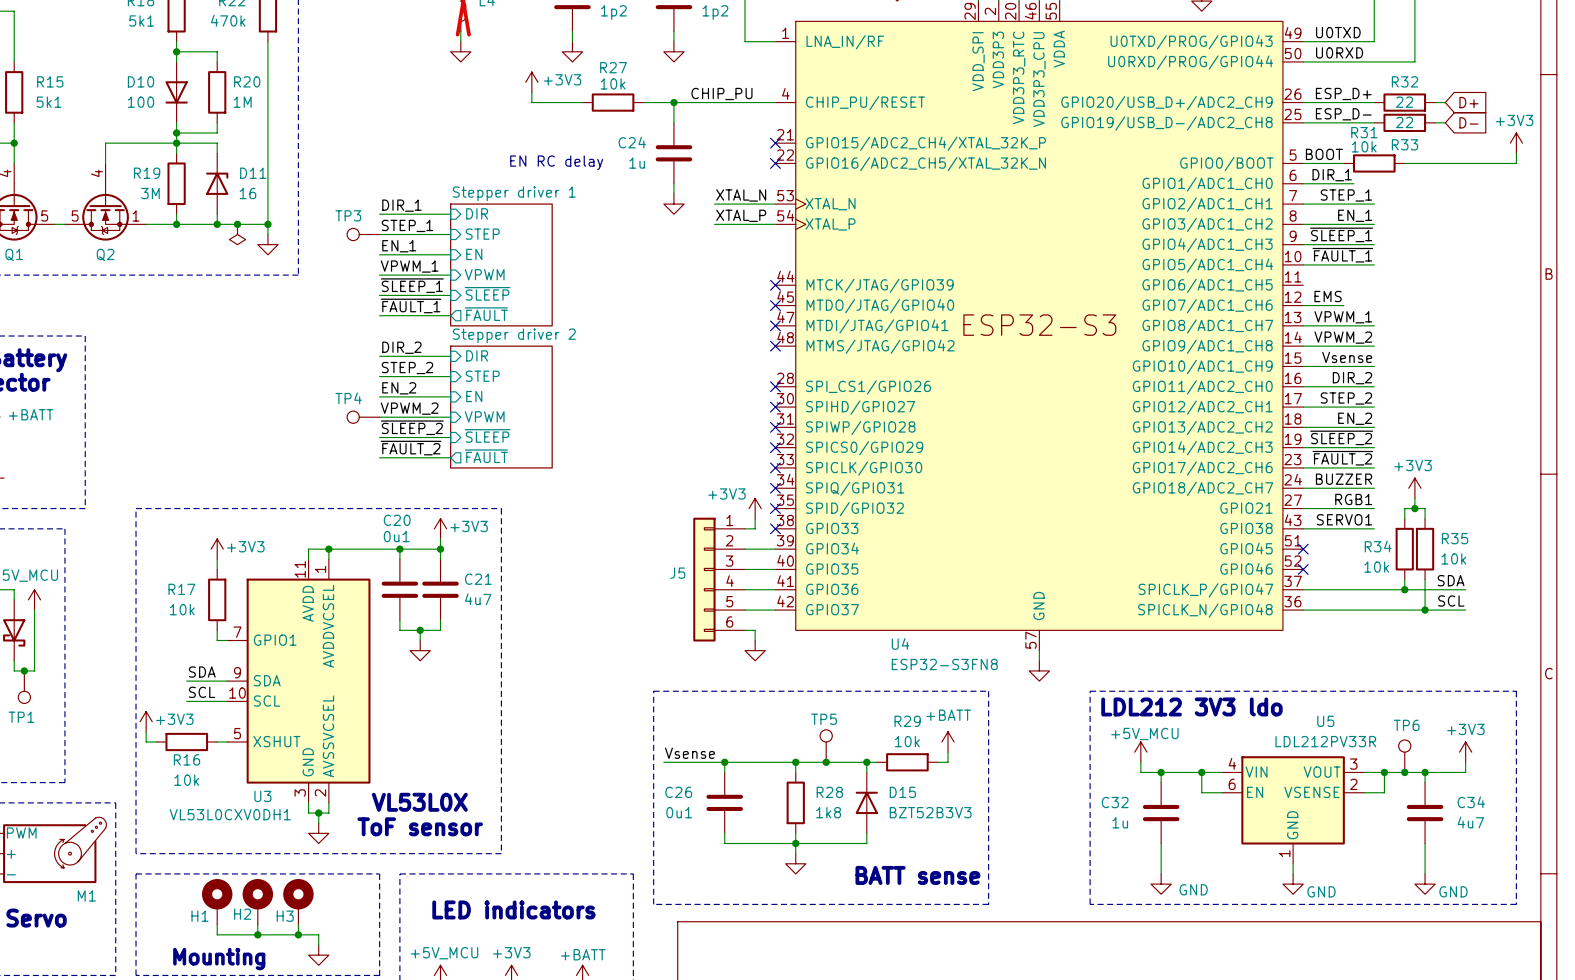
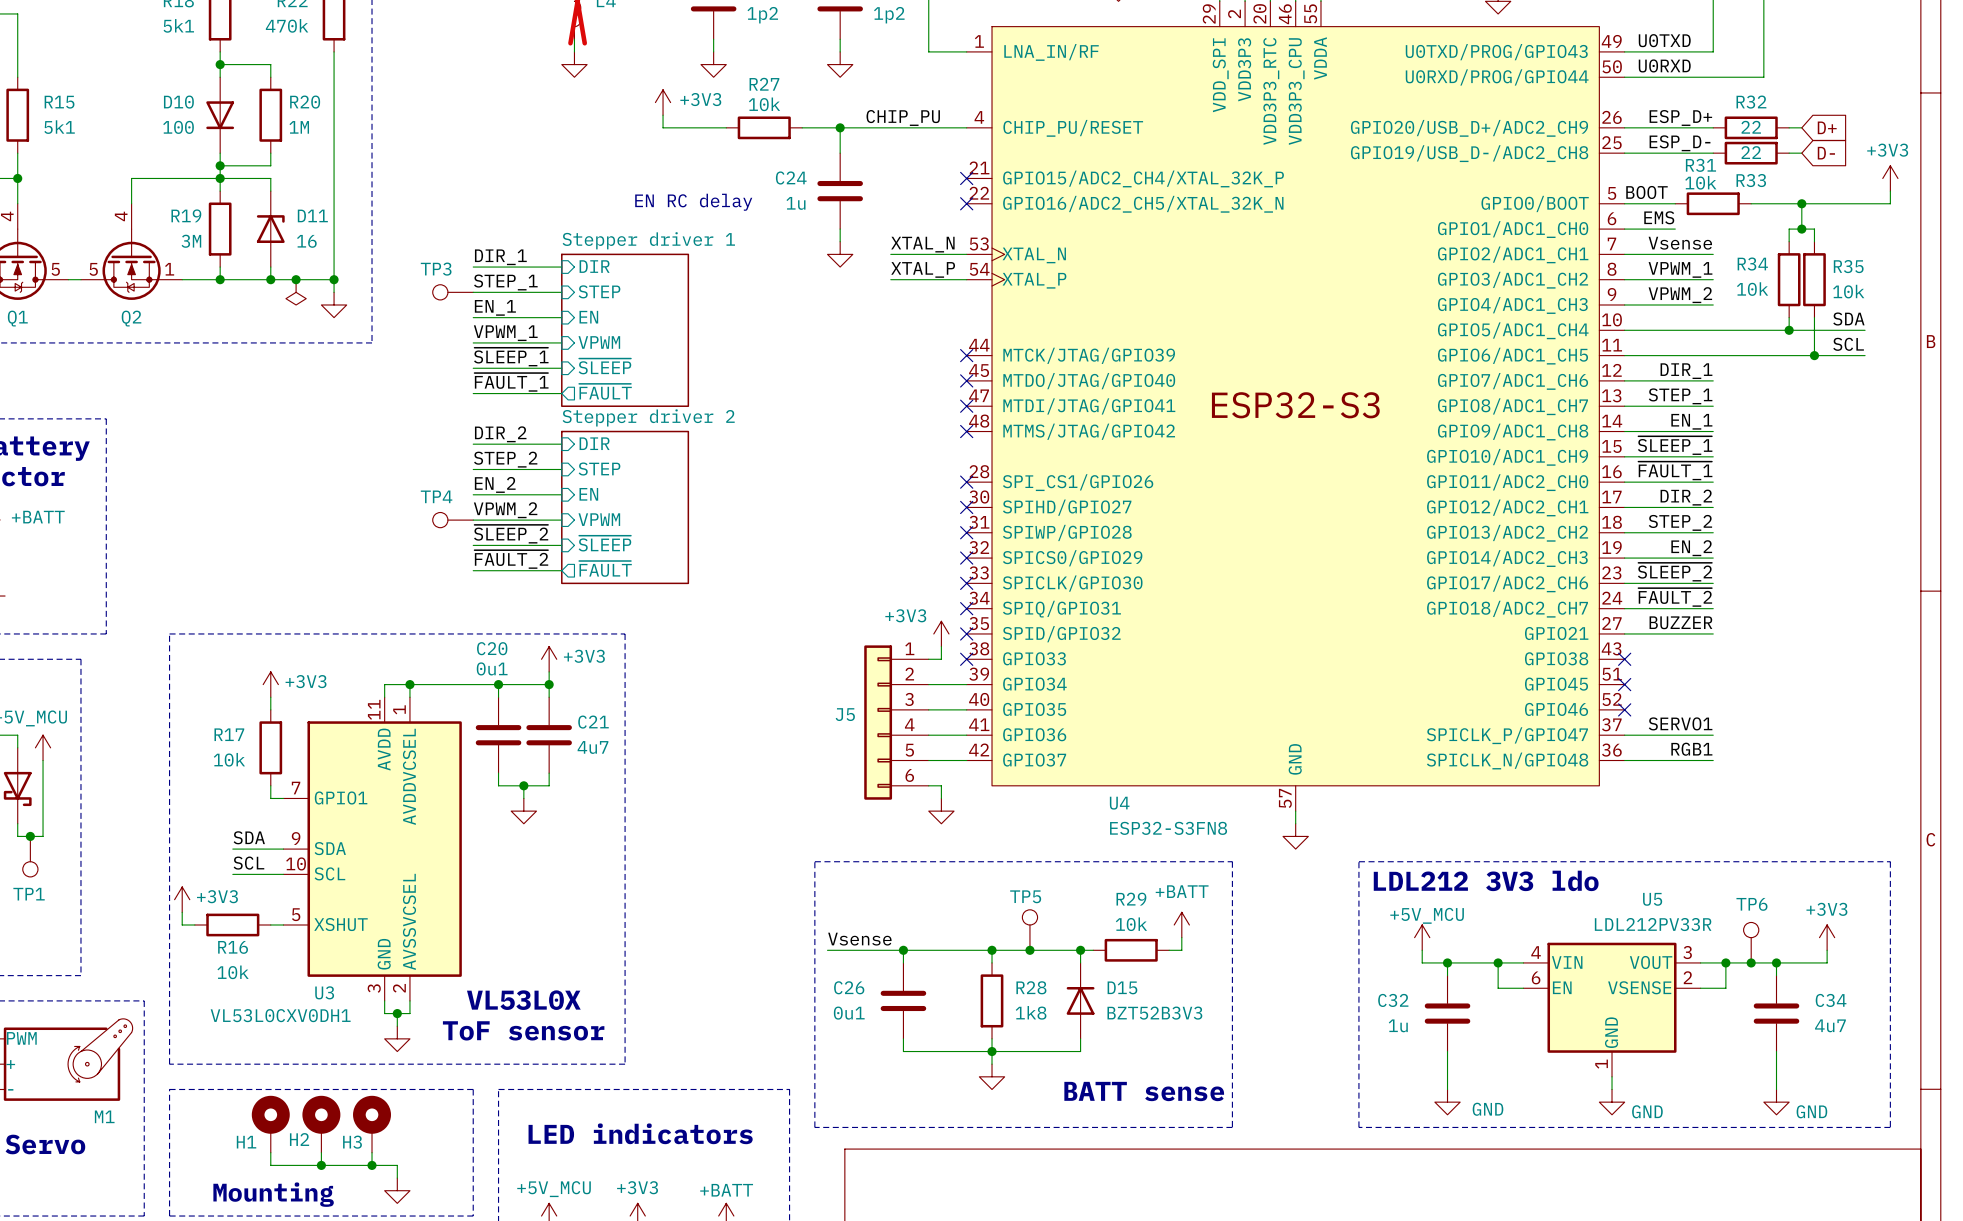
wire: none -> (1801, 203) (1801, 229)
junction: none -> (1801, 203)
label position: DIR_1 (1332, 175) -> DIR_1 (1686, 371)
wire: (1343, 183) (1354, 183) -> none
junction: none -> (1801, 229)
wire: none -> (1789, 241) (1789, 229) (1814, 229) (1814, 241)
label: STEP_1 (1346, 195) -> Vsense (1680, 243)
label: EN_1 (1355, 215) -> VPWM_1 (1680, 269)
label: ~{SLEEP_1} (1341, 234) -> VPWM_2 (1680, 295)
wire: none -> (1789, 317) (1789, 330)
wire: none -> (1814, 317) (1814, 355)
label: ~{FAULT_1} (1342, 255) -> none
label: none -> SDA (1848, 319)
wire: none -> (1713, 330) (1865, 330)
junction: none -> (1789, 330)
label: none -> SCL (1848, 344)
wire: none -> (1624, 355) (1865, 355)
junction: none -> (1814, 355)
label position: EMS (1328, 296) -> EMS (1659, 217)
wire: none -> (1675, 380) (1713, 380)
label: VPWM_1 (1343, 317) -> STEP_1 (1680, 396)
label: VPWM_2 (1343, 337) -> EN_1 (1691, 421)
label: Vsense (1347, 357) -> ~{SLEEP_1} (1675, 445)
label: DIR_2 (1352, 378) -> ~{FAULT_1} (1675, 470)
label: STEP_2 (1346, 398) -> DIR_2 (1686, 497)
label: EN_2 (1355, 418) -> STEP_2 (1680, 522)
label: ~{SLEEP_2} (1341, 437) -> EN_2 (1691, 548)
label: ~{FAULT_2} (1342, 458) -> ~{SLEEP_2} (1675, 572)
label: BUZZER (1344, 479) -> ~{FAULT_2} (1675, 597)
power symbol: +3V3 (1414, 488) -> none
wire: (1414, 498) (1414, 508) -> none
label: RGB1 (1353, 499) -> BUZZER (1680, 622)
junction: (1414, 508) -> none
wire: (1404, 518) (1404, 508) (1425, 508) (1425, 518) -> none
label position: SERVO1 (1344, 519) -> SERVO1 (1680, 723)
wire: (1303, 528) (1374, 528) -> none
no-connect mark: none -> (1624, 659)
R34 name position: R34 (1378, 546) -> R34 (1752, 264)
R34 position: (1404, 549) -> (1789, 279)
R35 position: (1425, 549) -> (1814, 279)
R34 value position: 10k (1376, 567) -> 10k (1752, 289)
wire: (1404, 579) (1404, 589) -> none
wire: (1425, 579) (1425, 610) -> none
label: SDA (1451, 580) -> none
wire: (1374, 589) (1465, 589) -> none
junction: (1404, 589) -> none
label: none -> RGB1 (1691, 749)
label: SCL (1451, 600) -> none
wire: (1374, 610) (1465, 610) -> none
junction: (1425, 610) -> none

